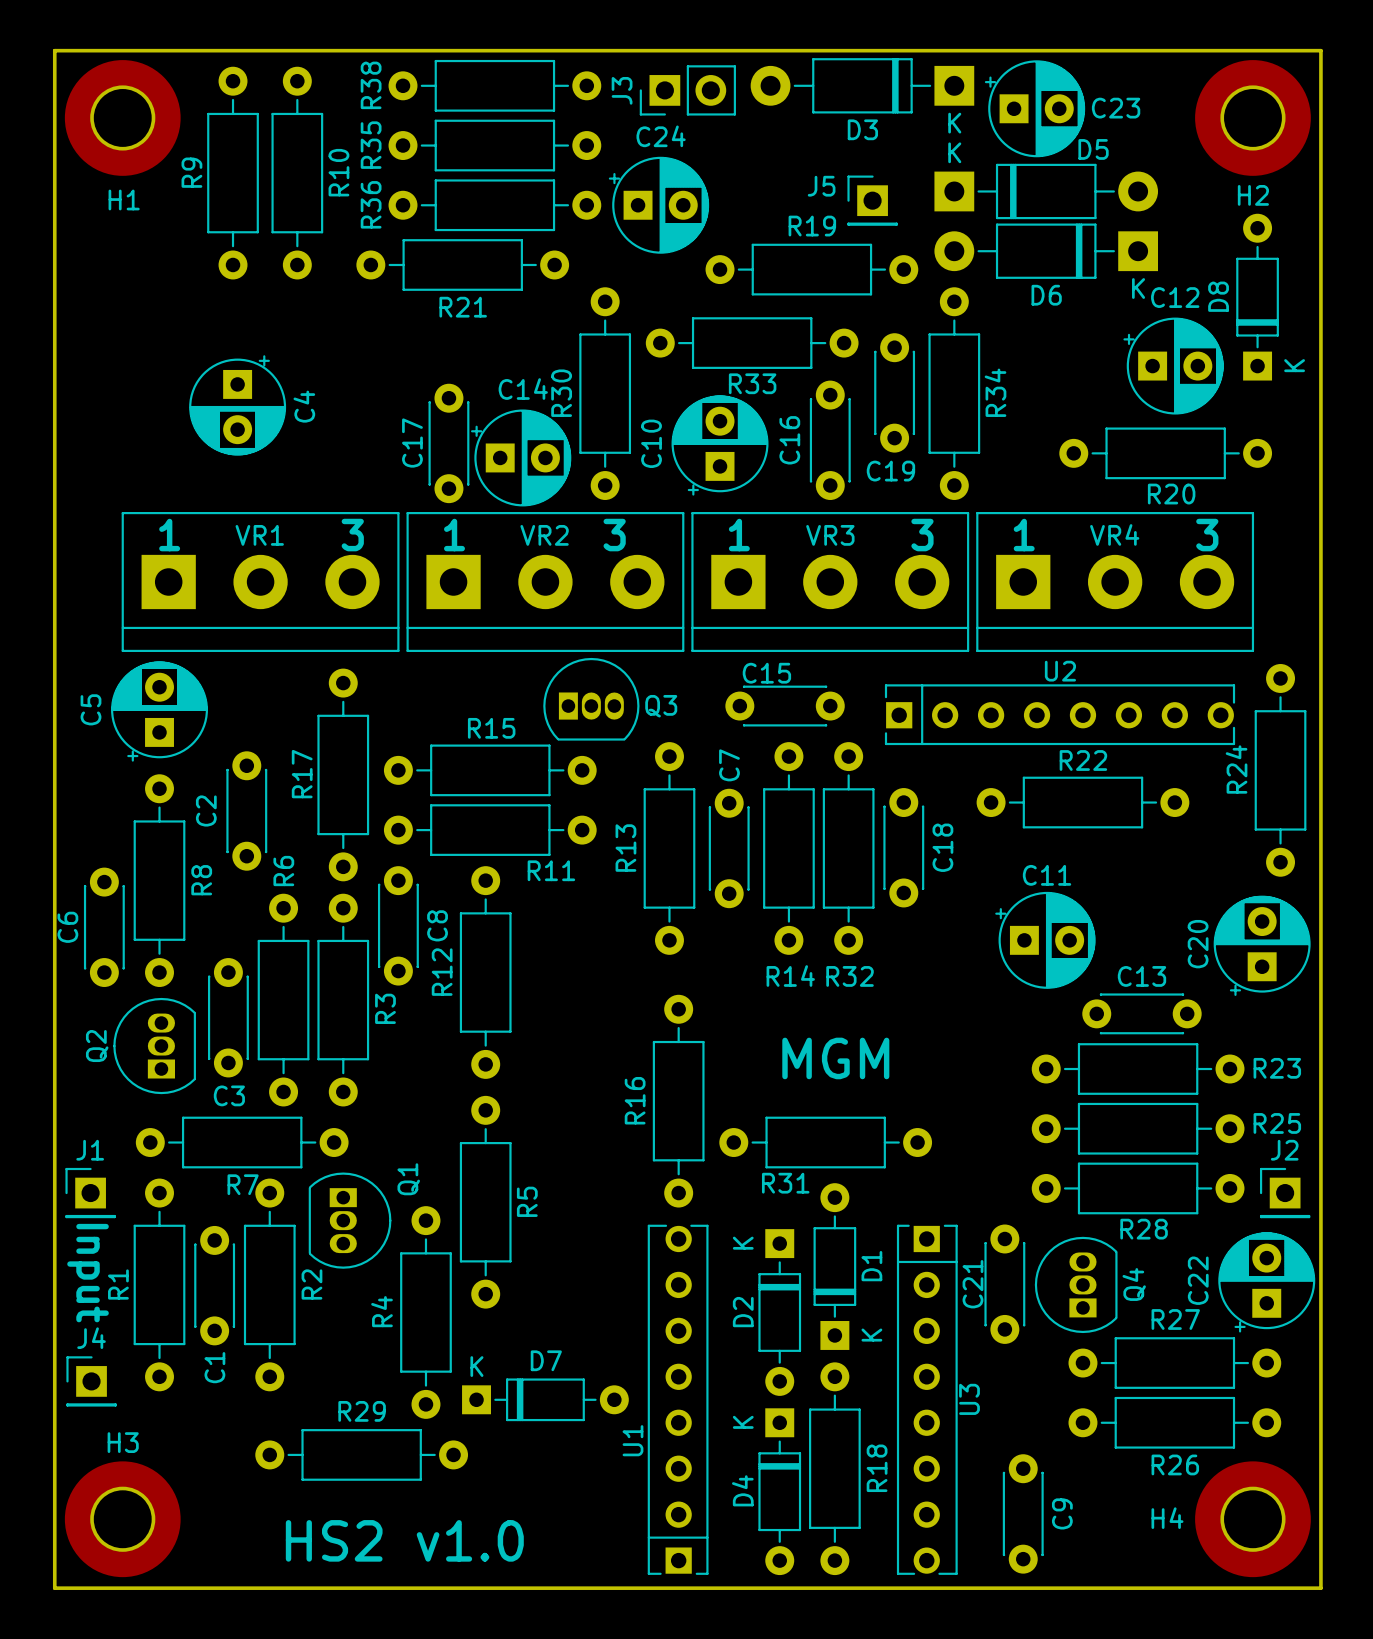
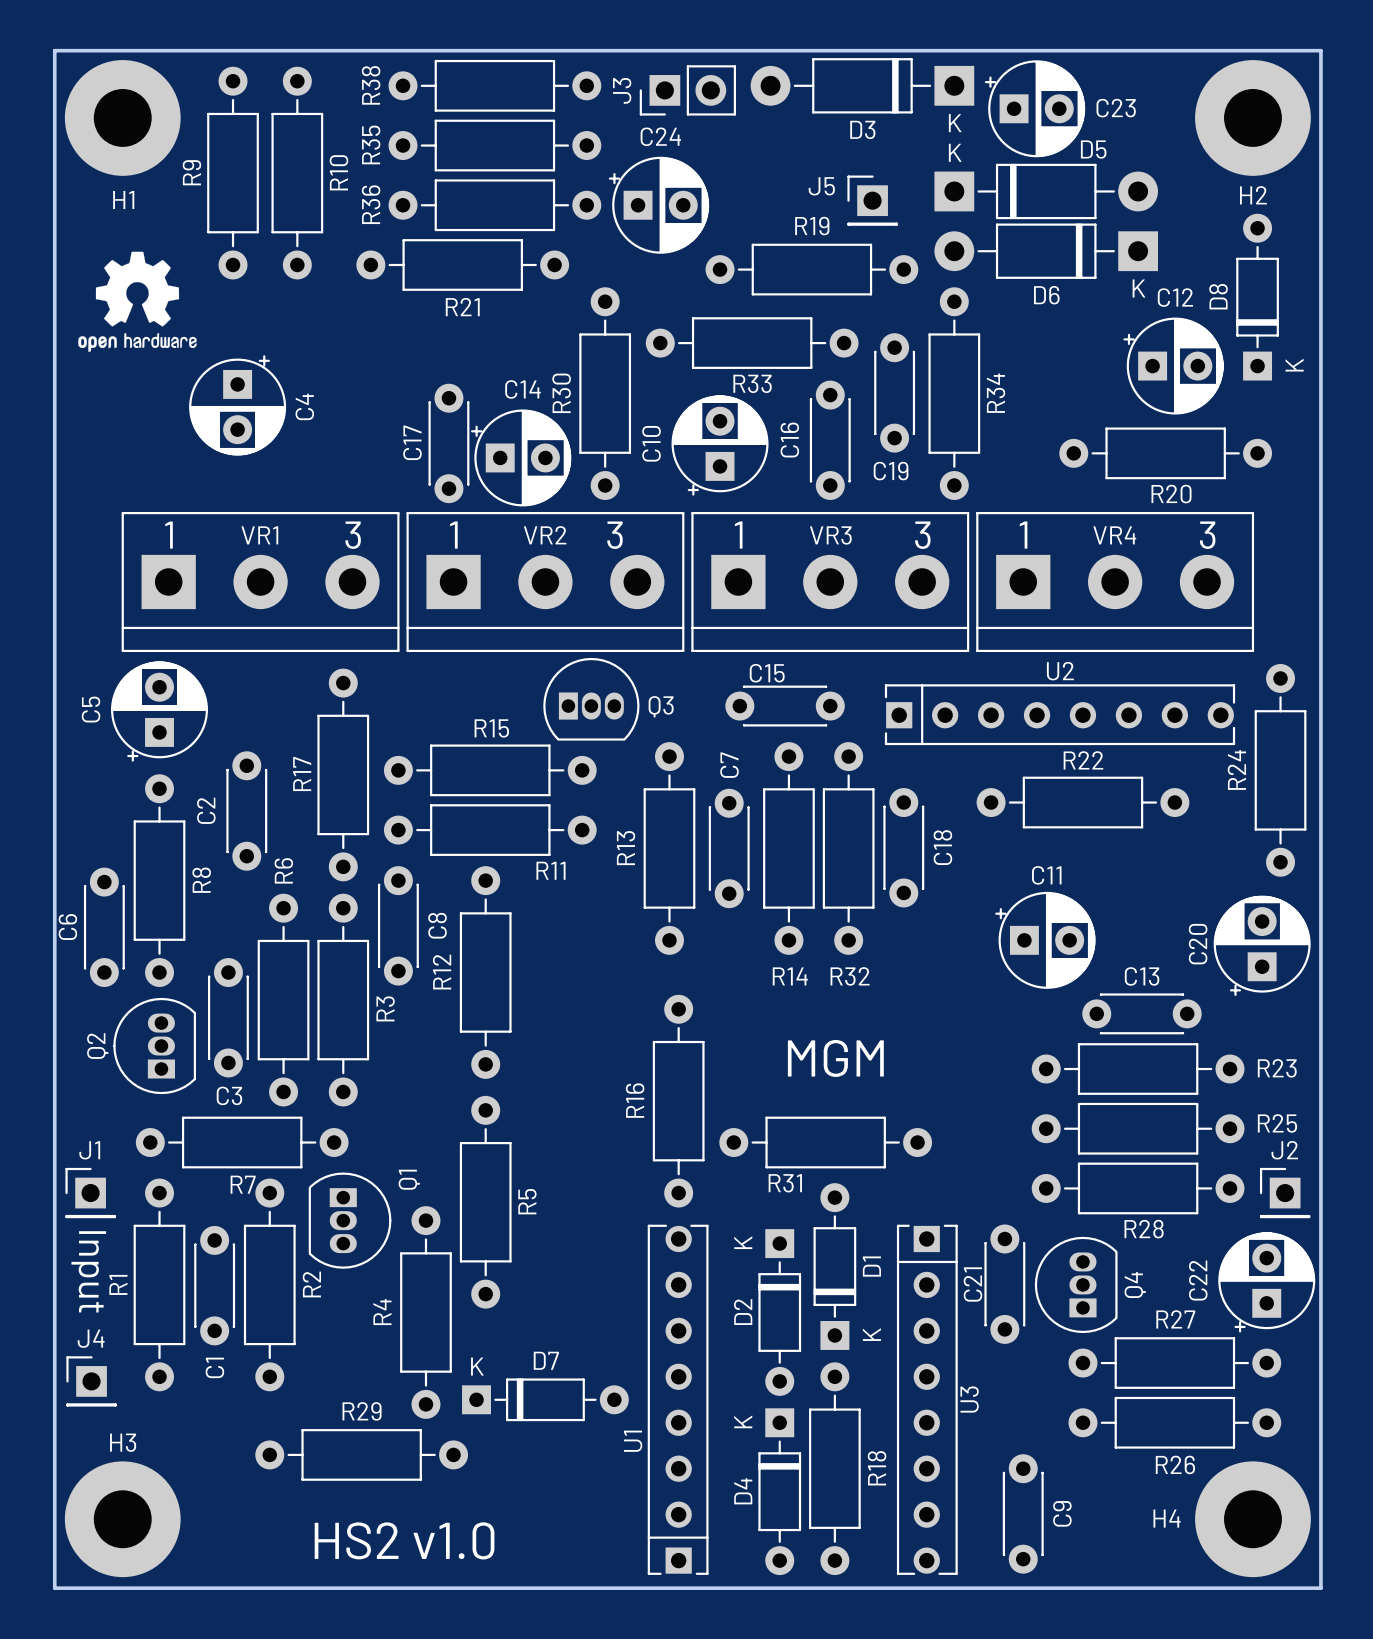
drawing: none -> [78, 251, 197, 352]

